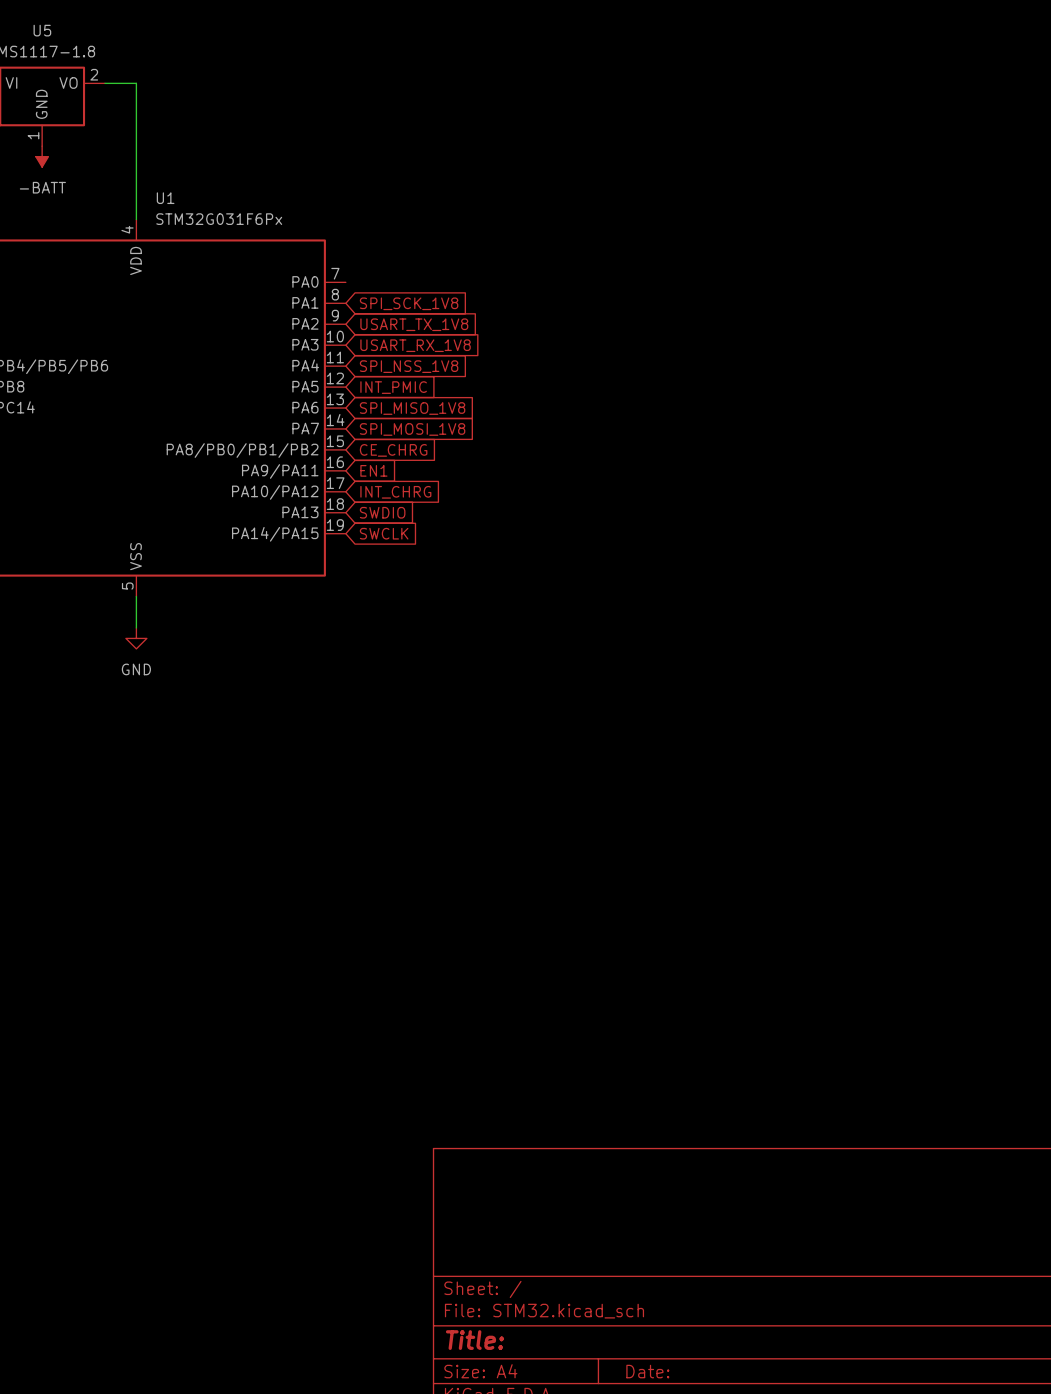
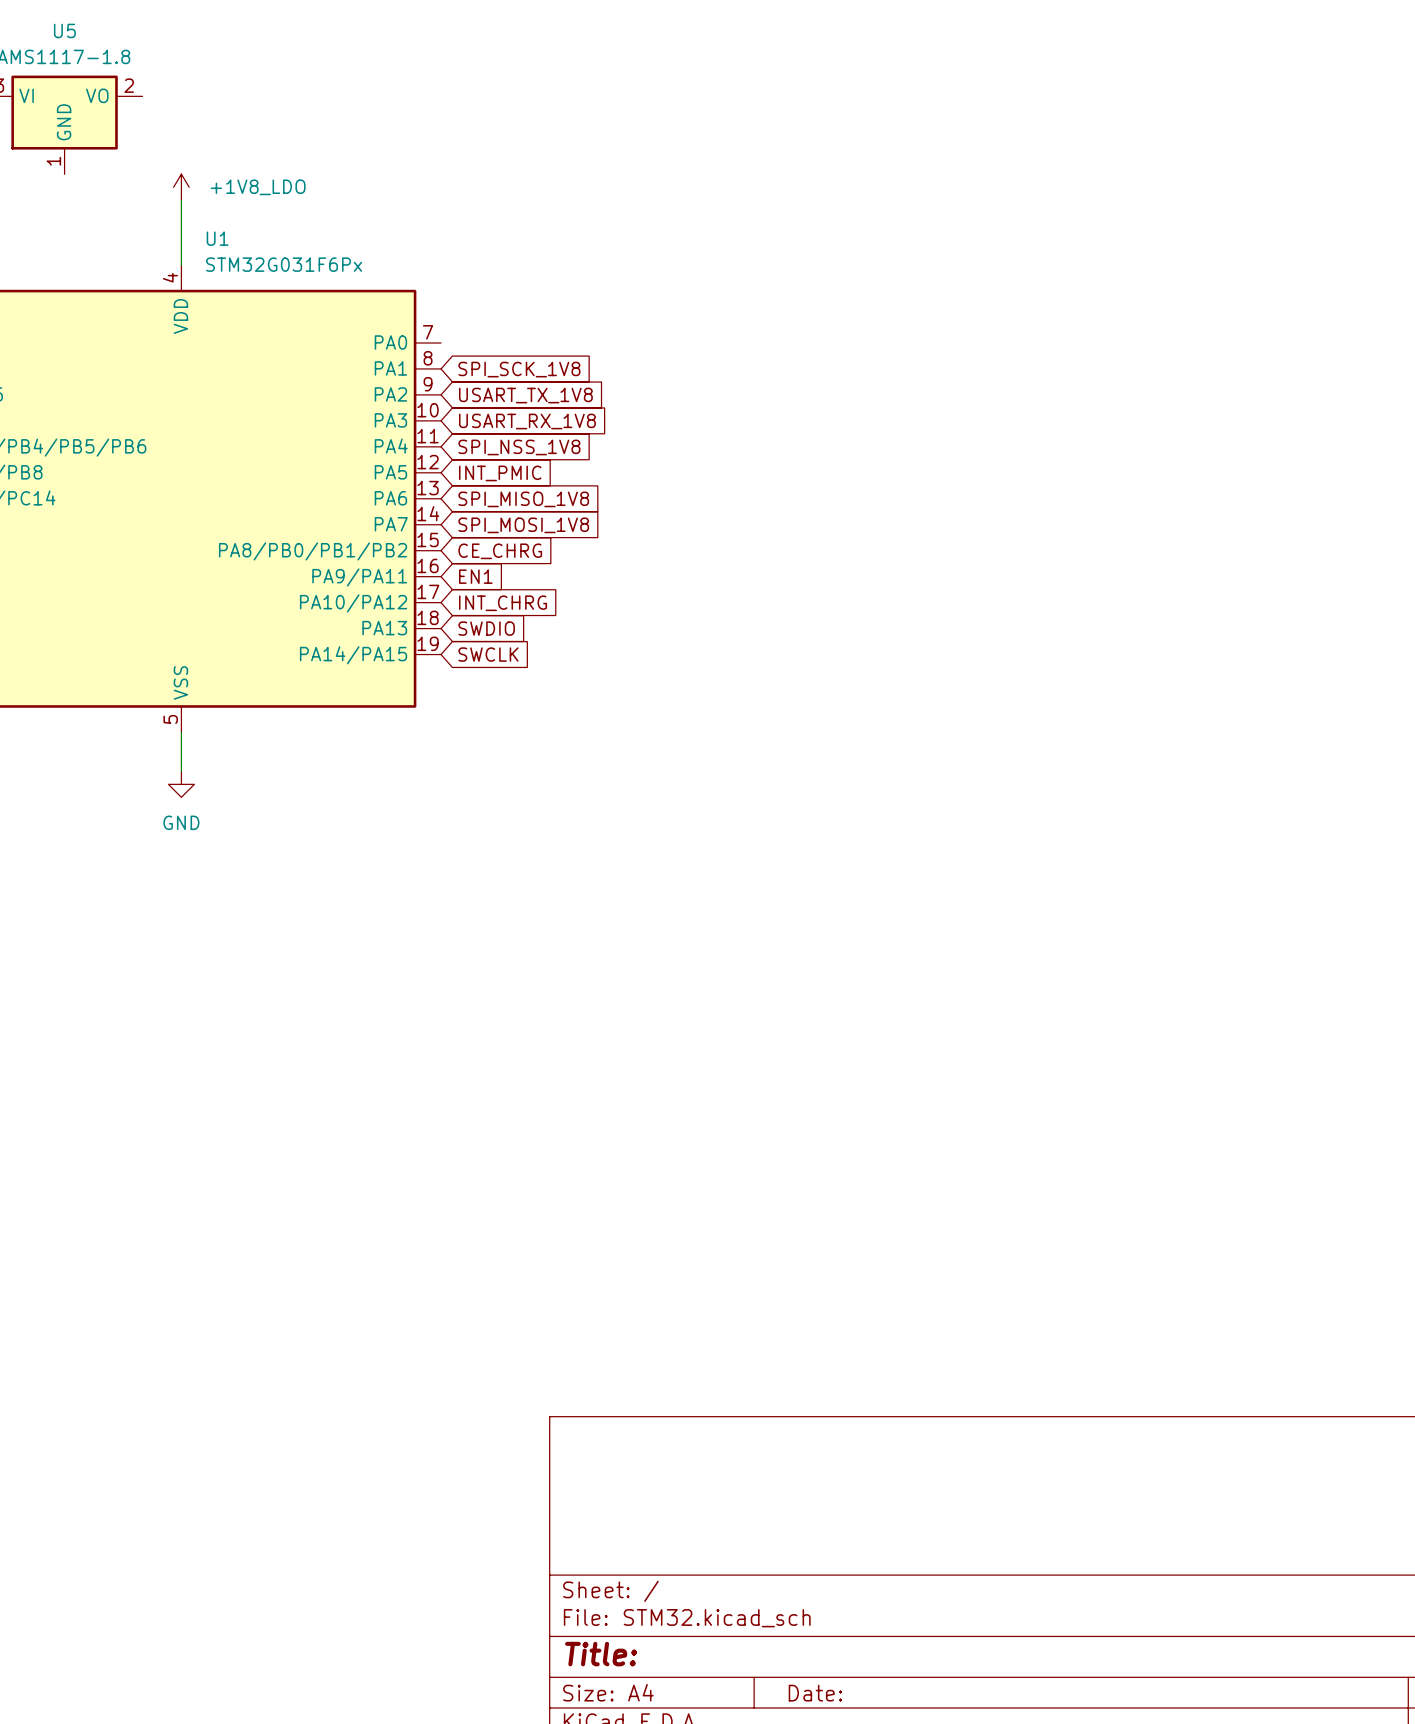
wire: (104, 83) (136, 83) (136, 167) -> none
power symbol: -BATT (42, 156) -> none
power symbol: none -> +1V8_LDO (181, 187)

